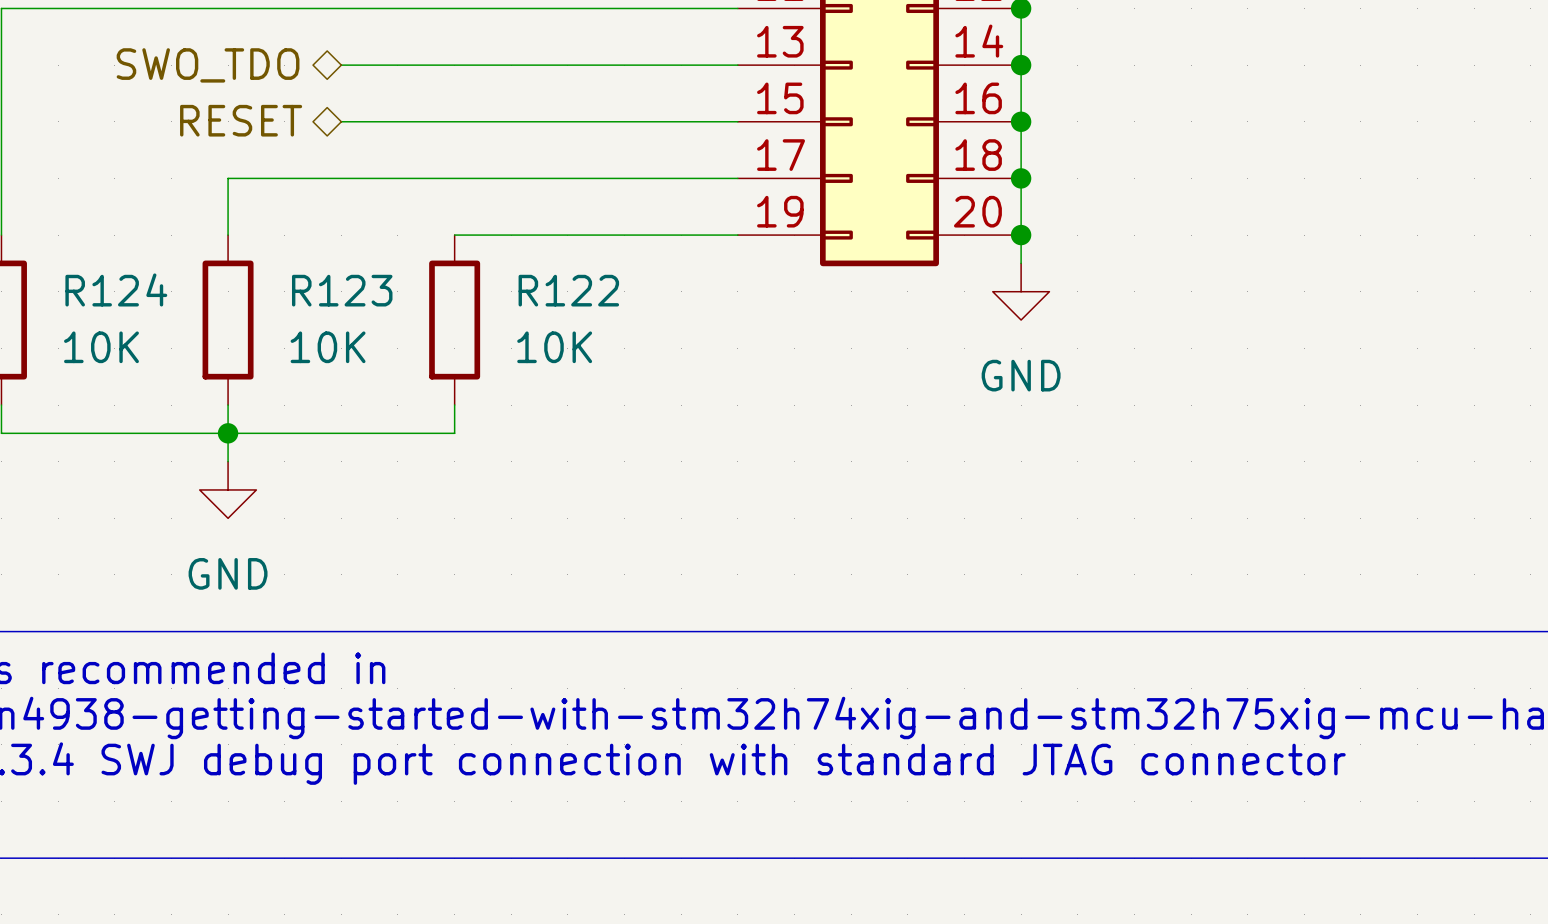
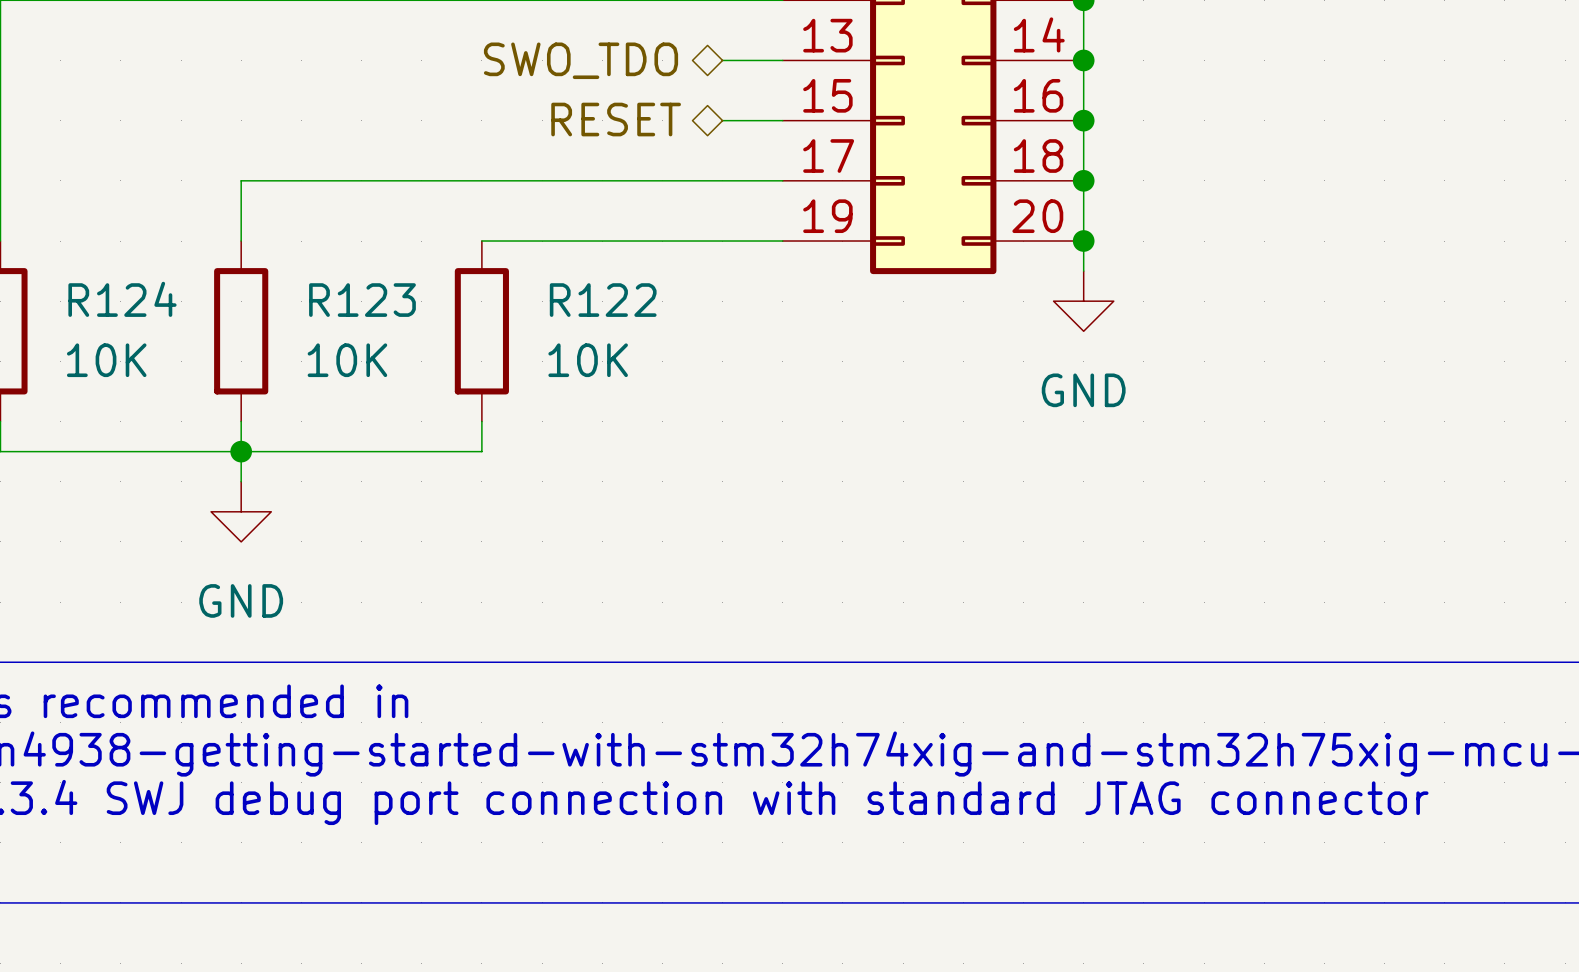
hierarchical label position: SWO_TDO (208, 65) -> SWO_TDO (581, 60)
wire: (341, 65) (681, 65) -> none
hierarchical label position: RESET (241, 120) -> RESET (616, 119)
wire: (341, 121) (681, 121) -> none

